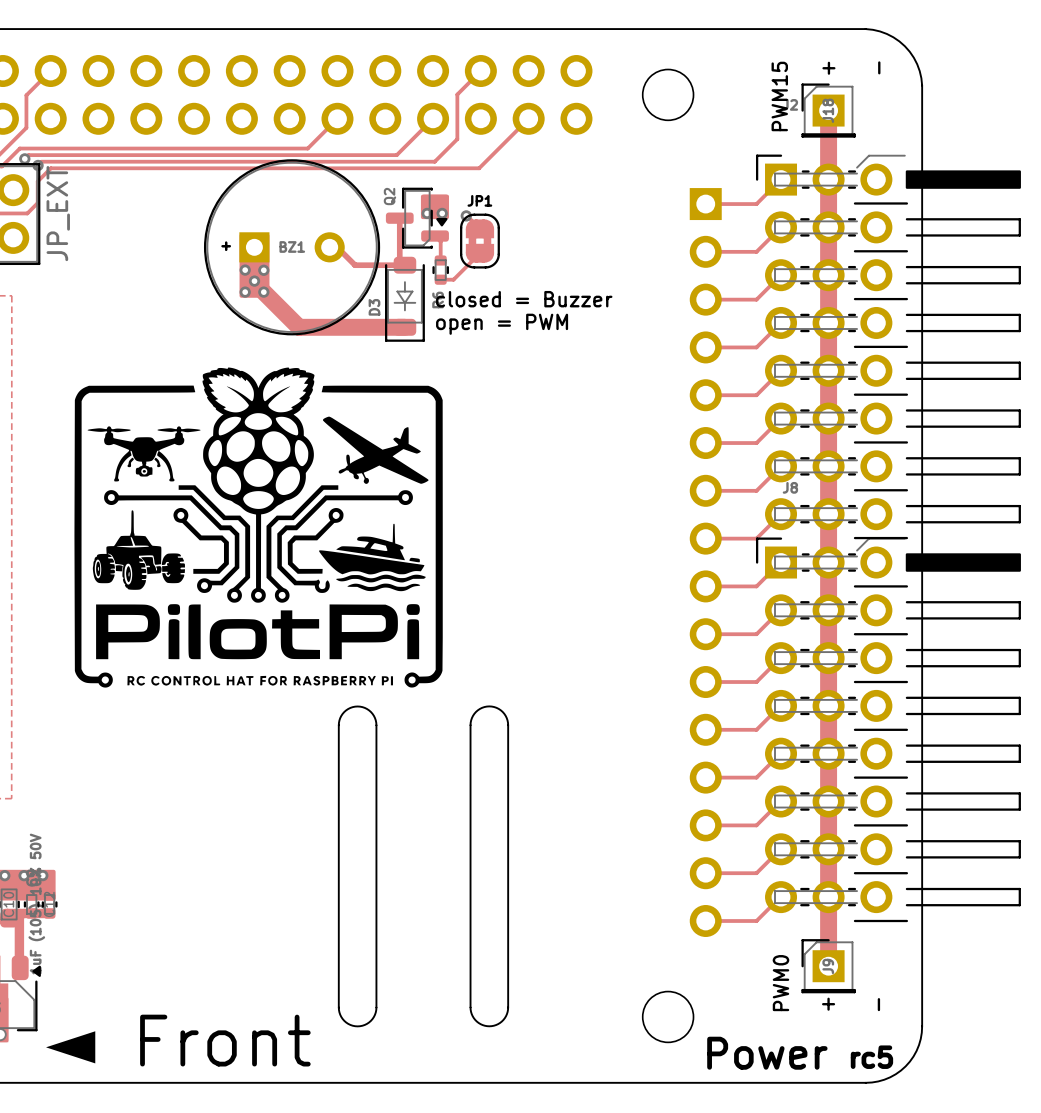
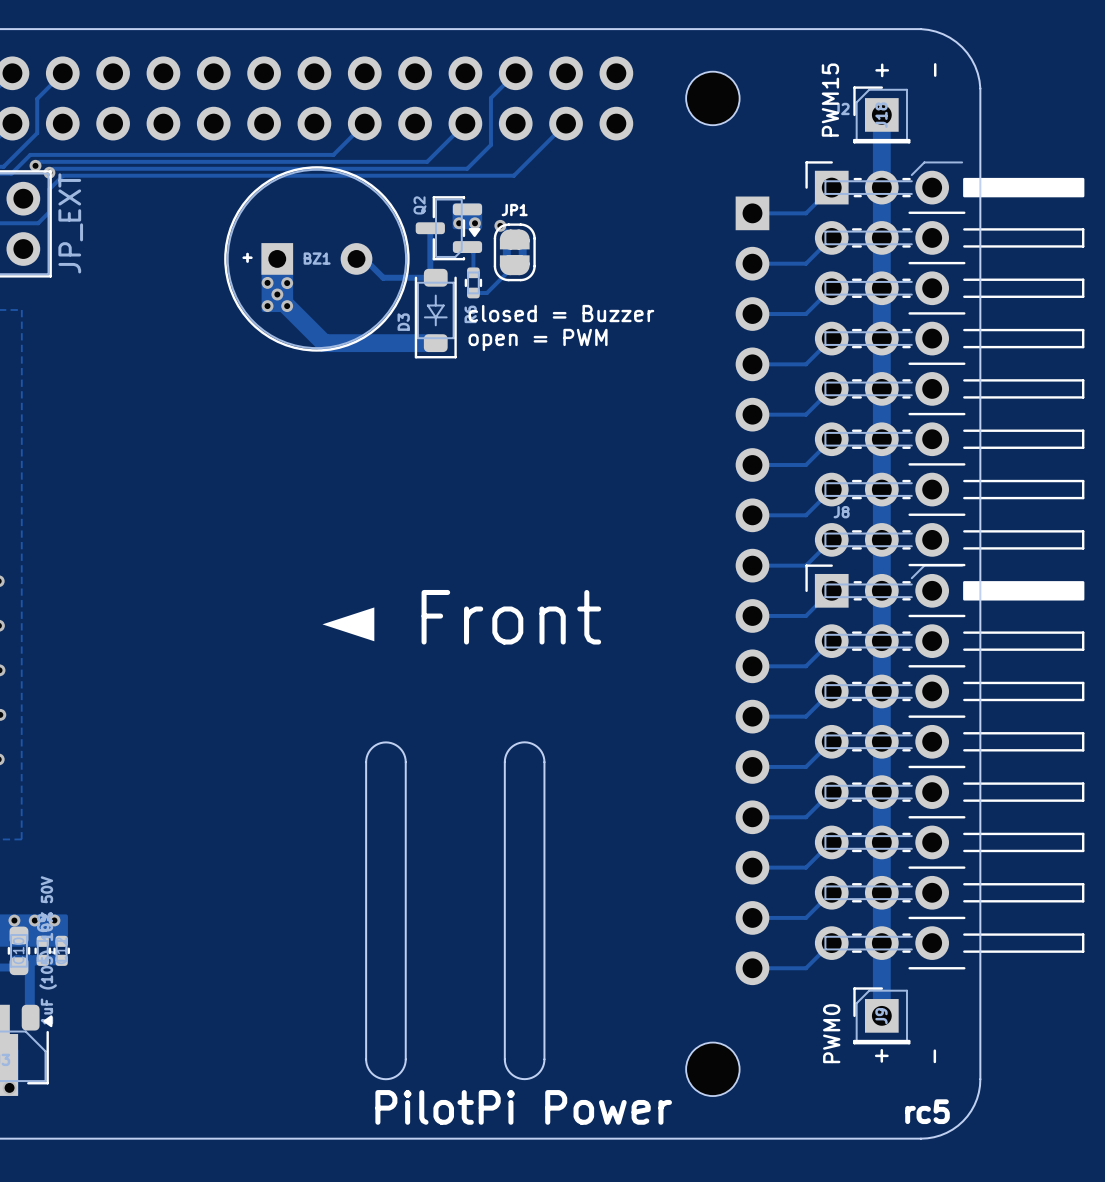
drawing: [74, 367, 443, 688] -> none
text: none -> ◄ Front (460, 617)
text: ◄ Front (177, 1040) -> none
text: none -> PilotPi Power (523, 1107)
text: Power (767, 1053) -> none

